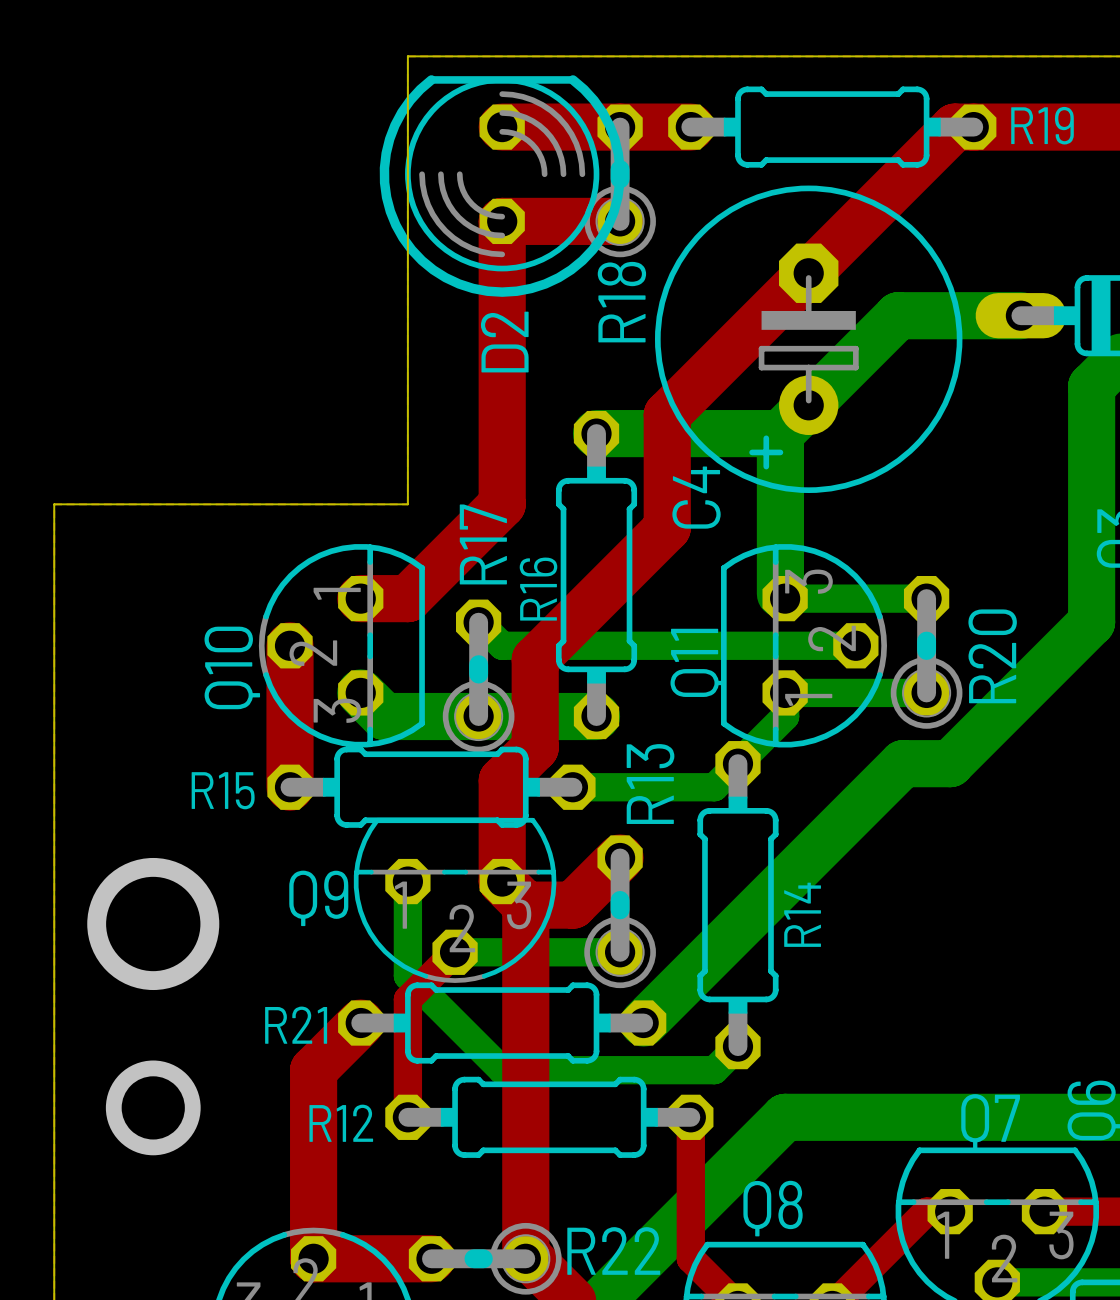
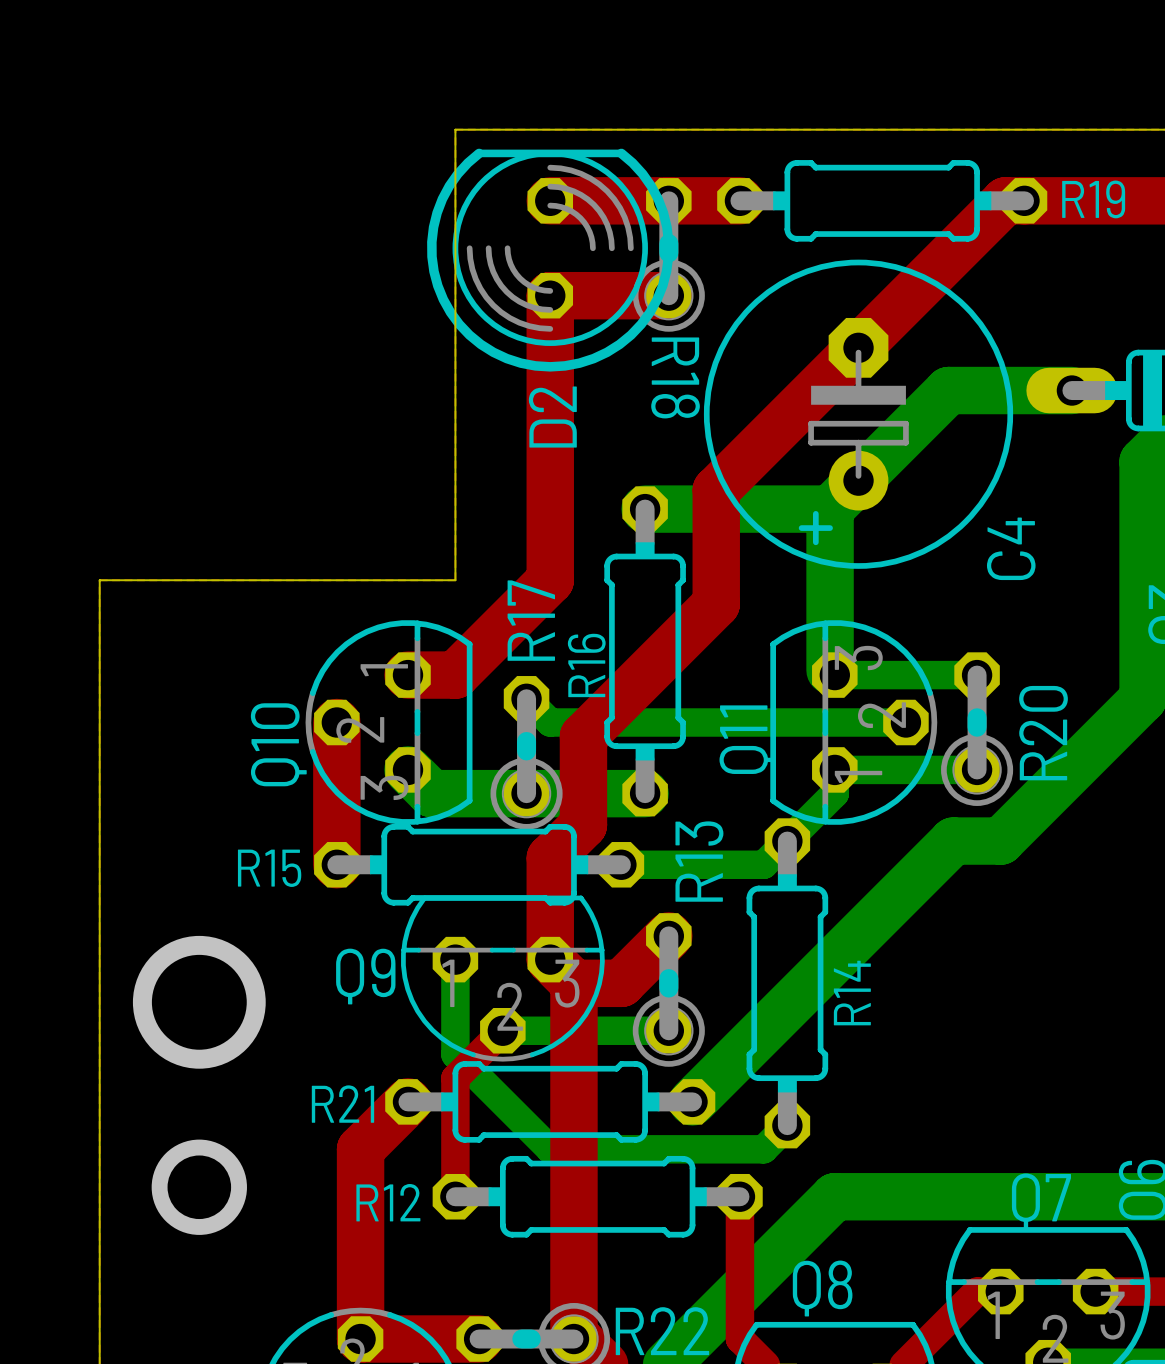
R18 name rotation: 0° (621, 302) -> 180° (675, 377)
C4 name position: C4 (696, 497) -> C4 (1011, 548)

